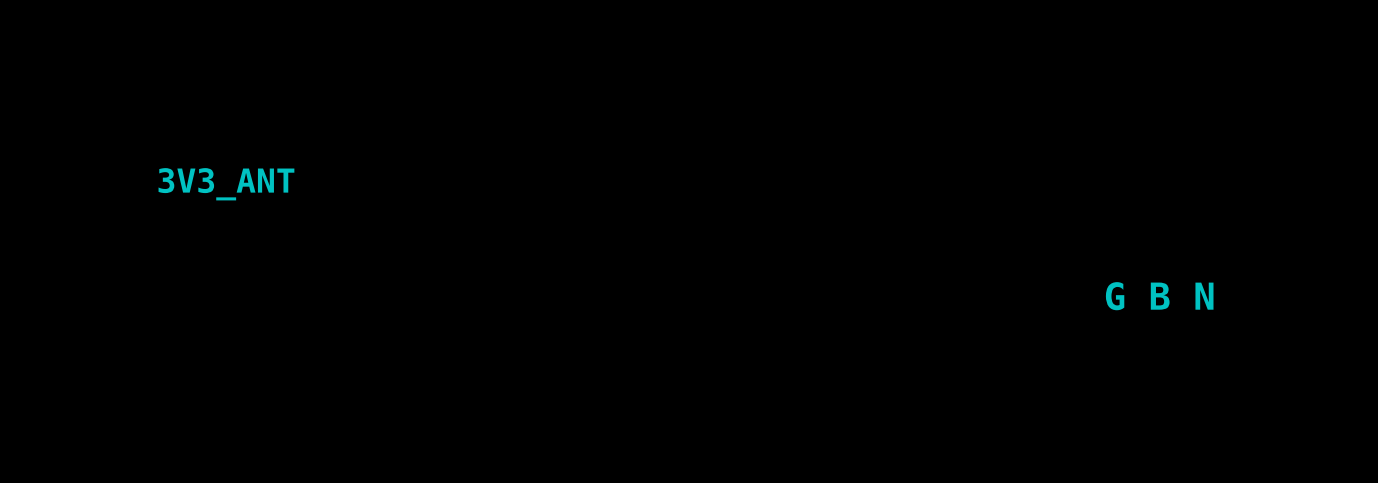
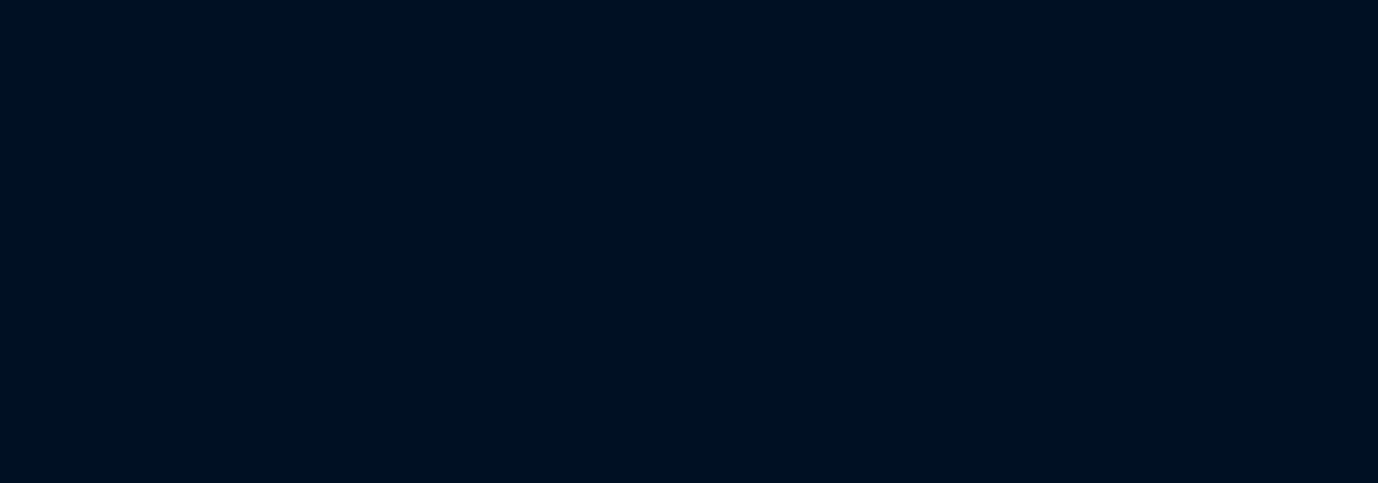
text: 3V3_ANT (226, 184) -> none
text: G B N (1159, 296) -> none

